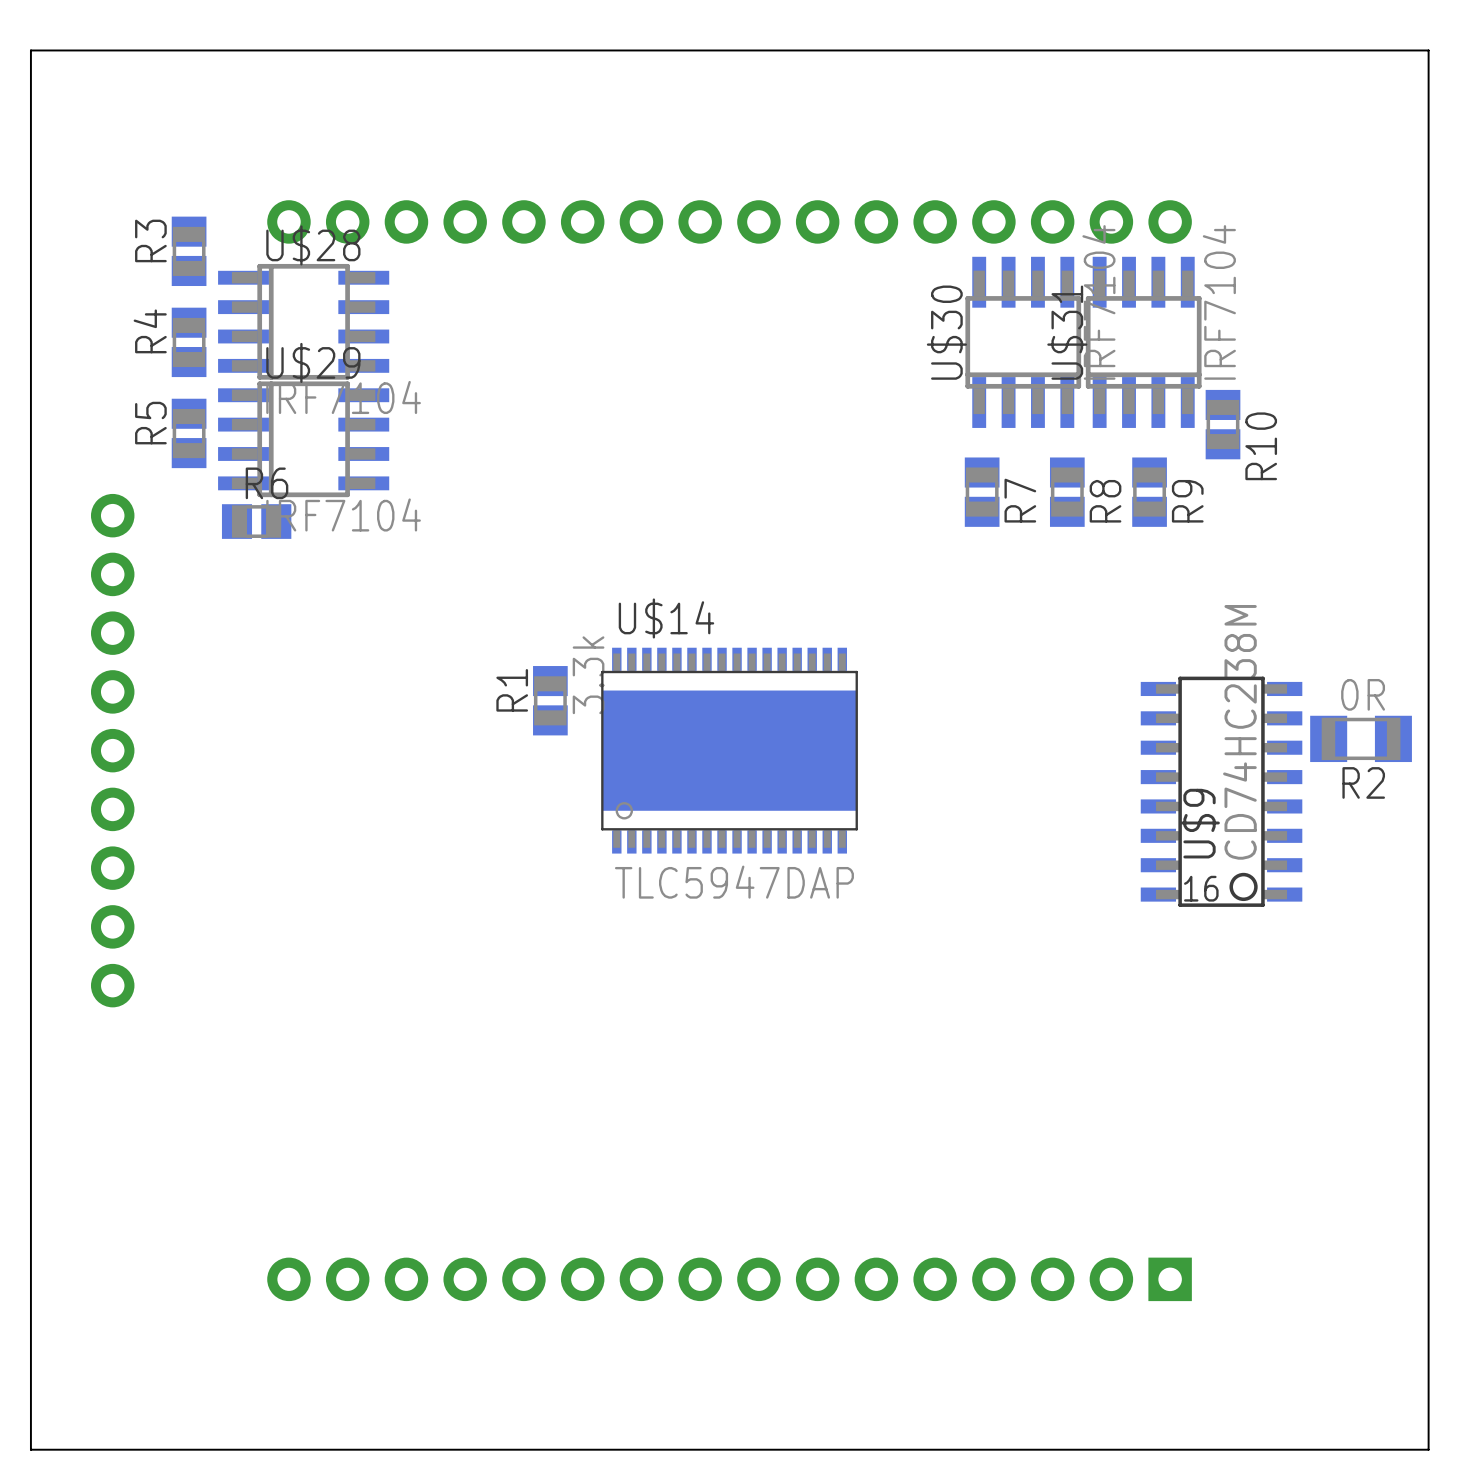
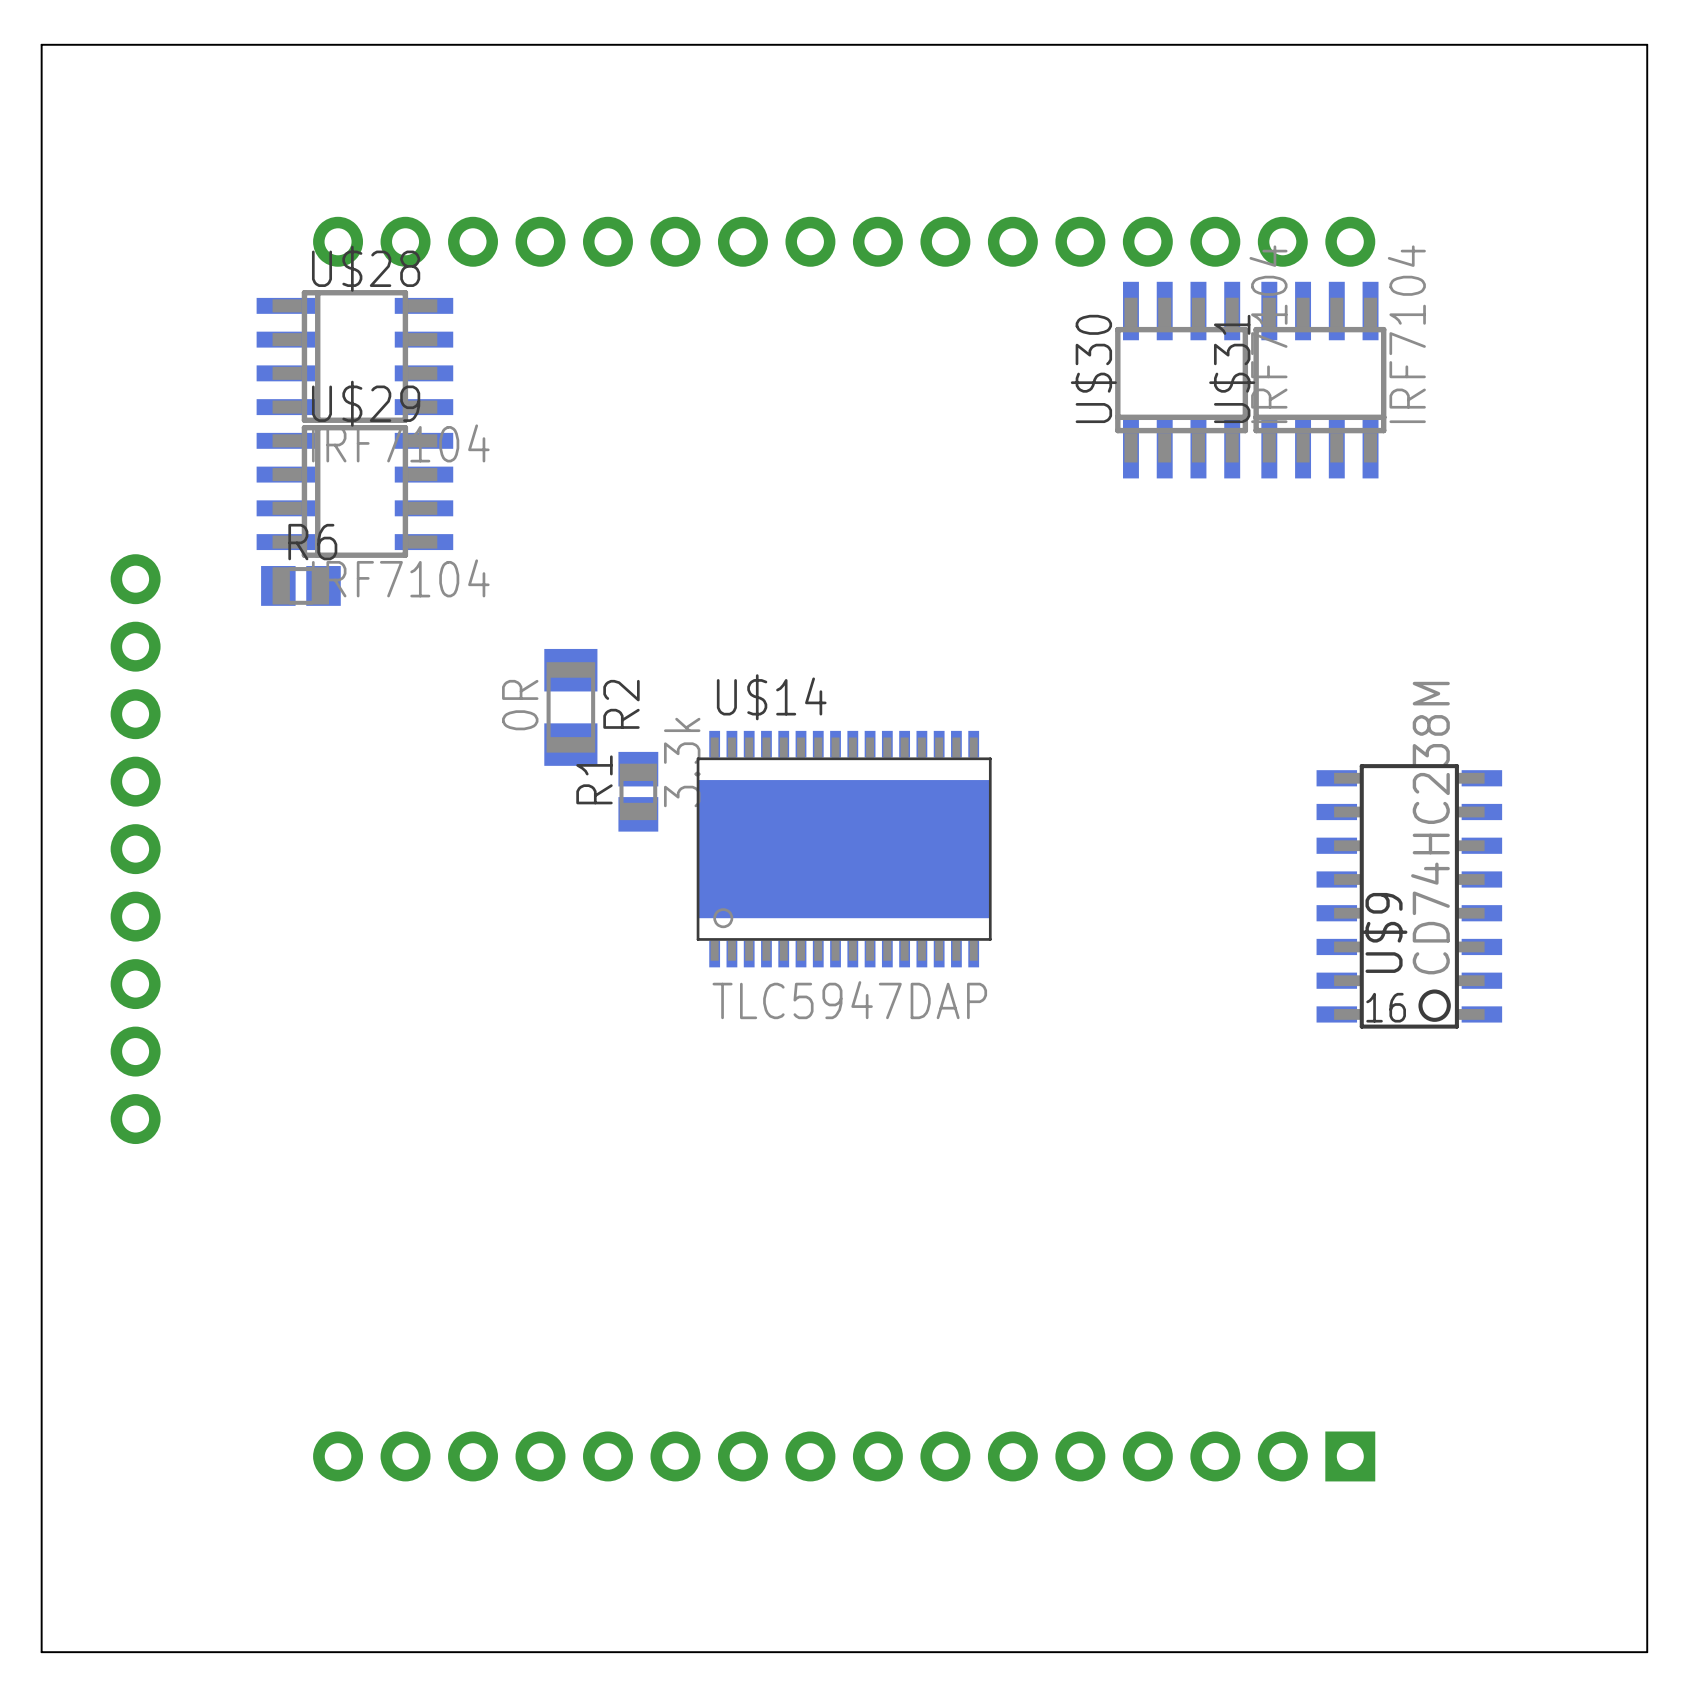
R3: (189, 251) -> none
R4: (189, 342) -> none
R10: (1223, 424) -> none
R5: (189, 433) -> none
R7: (982, 492) -> none
R8: (1067, 492) -> none
R9: (1149, 492) -> none
R2 value position: 0R (1363, 694) -> 0R (520, 705)
R2 rotation: 0° (1361, 738) -> 90° clockwise (570, 707)
R2 position: (1361, 738) -> (570, 707)
R2 name position: R2 (1363, 782) -> R2 (621, 704)

